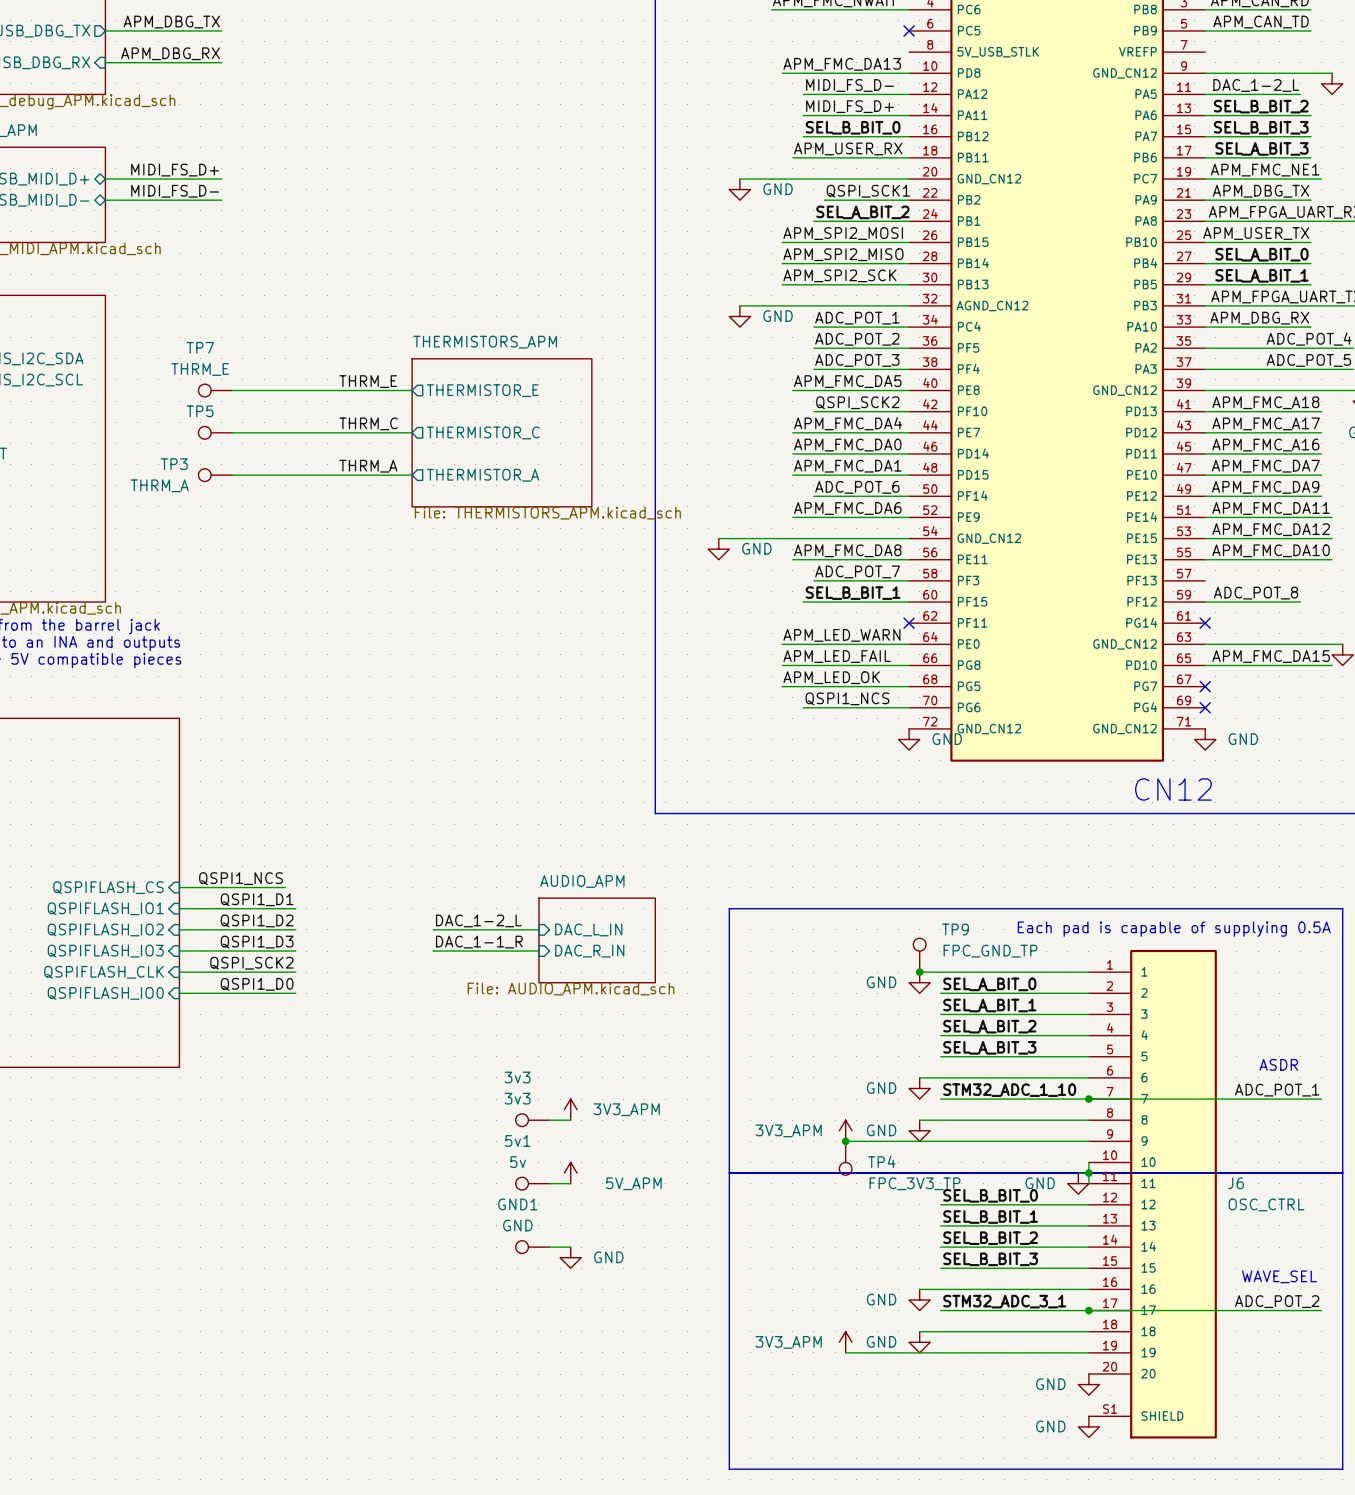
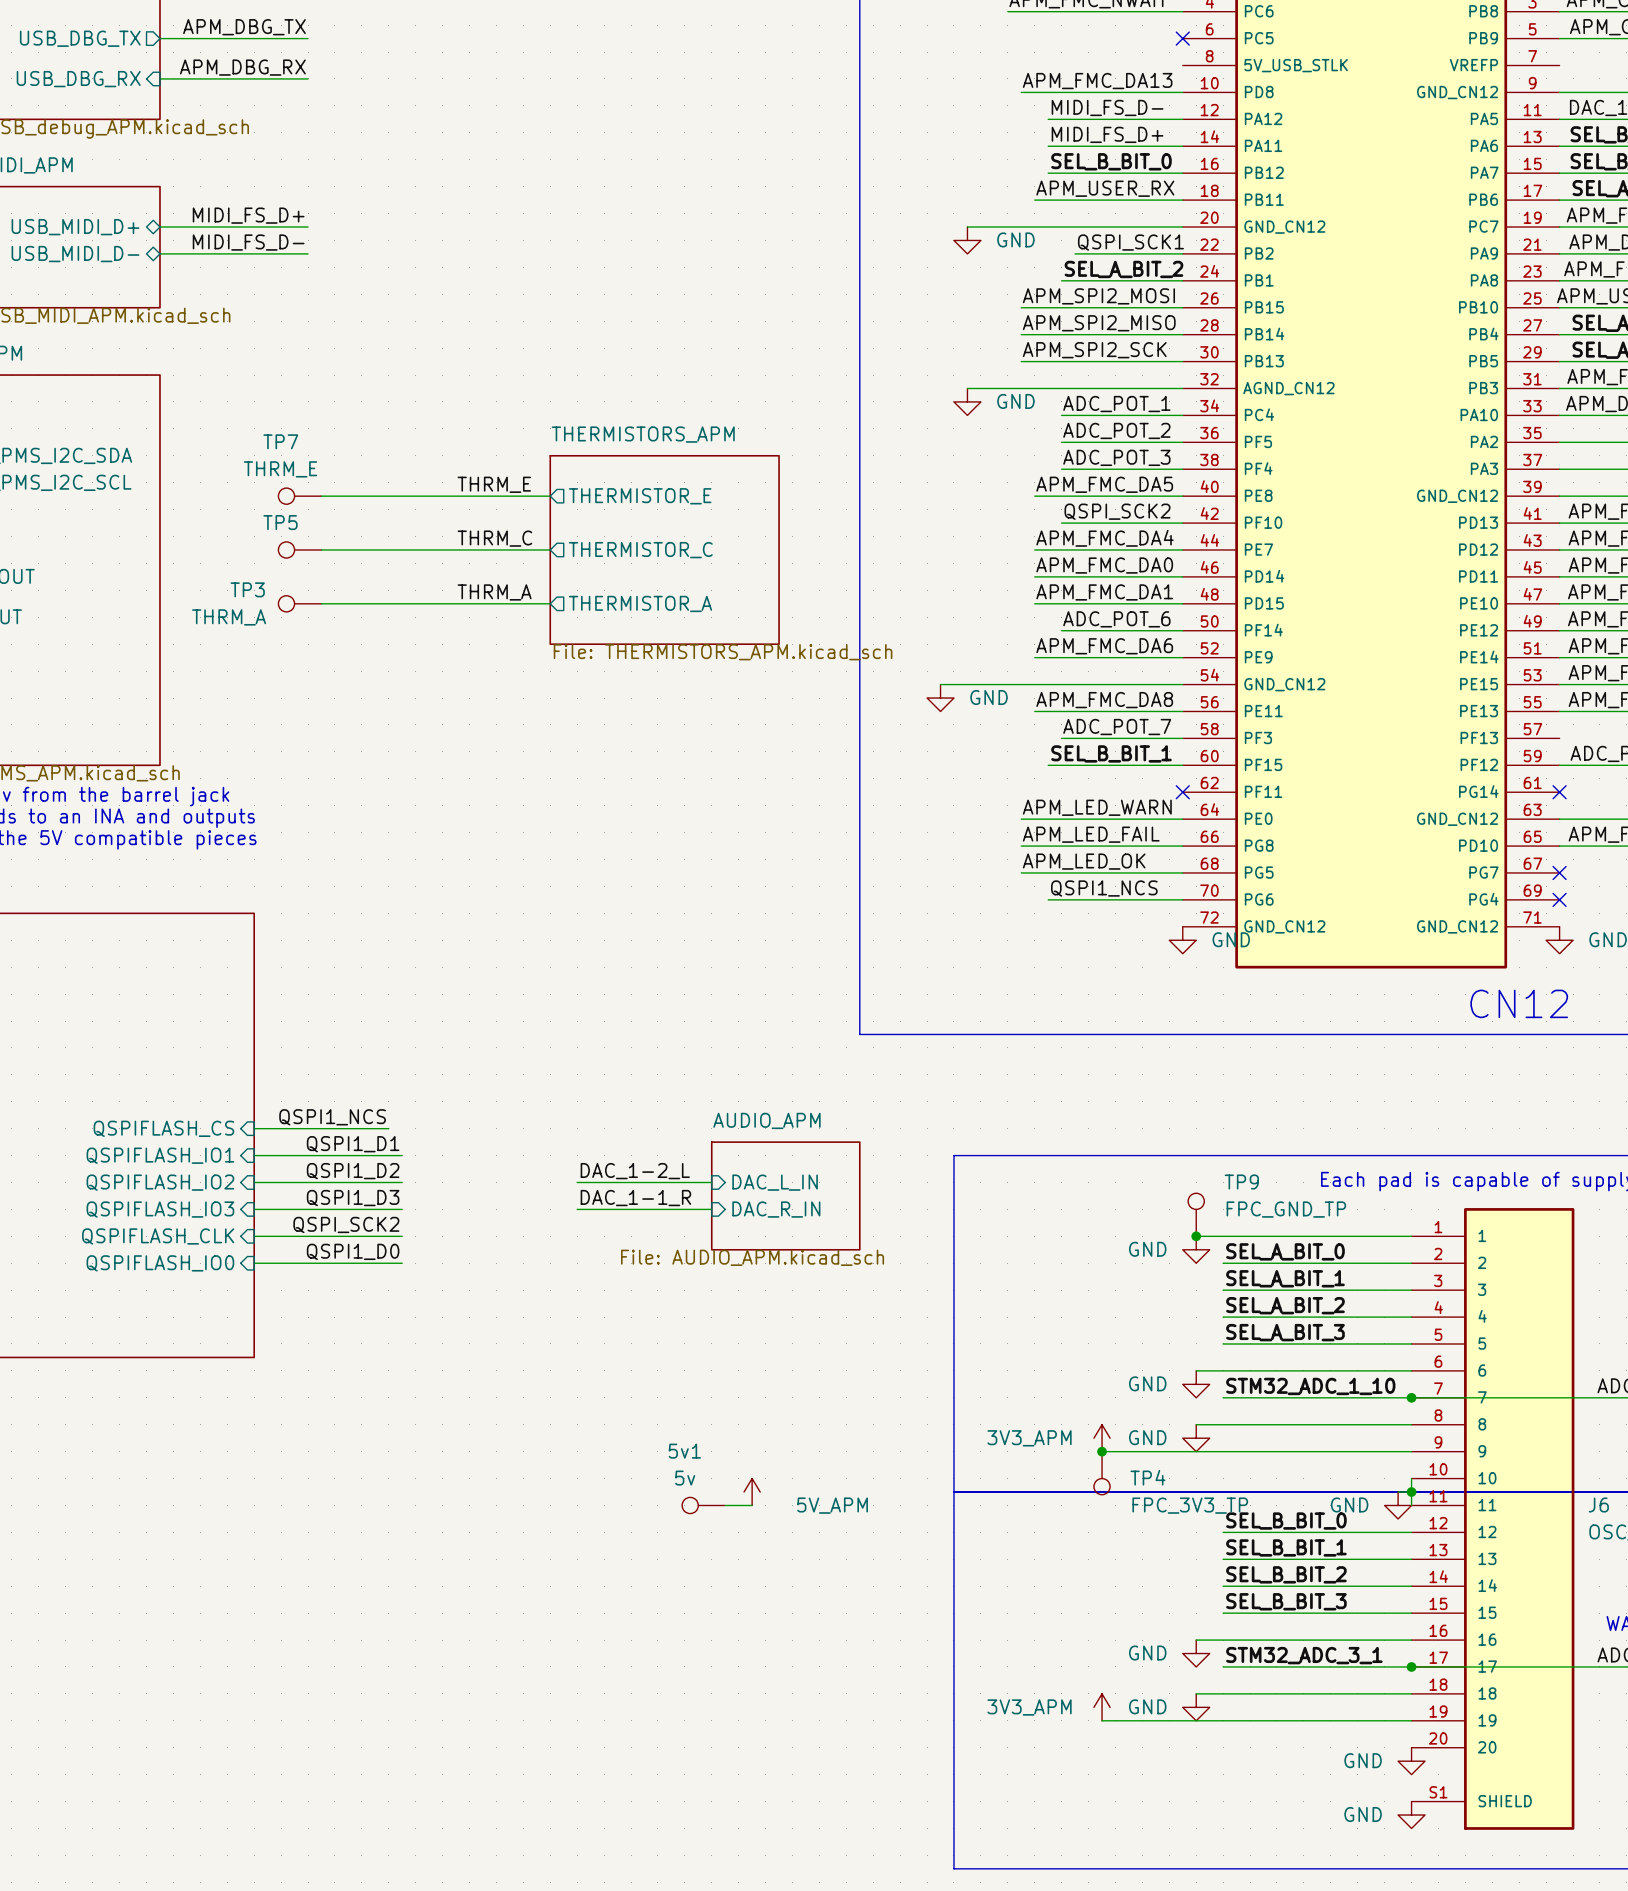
power symbol: 3V3_APM (570, 1109) -> none
3v3: 3v3 (532, 1120) -> none
wire: (549, 1120) (570, 1120) -> none
GND1: GND (532, 1247) -> none
wire: (549, 1247) (570, 1247) -> none
power symbol: GND (570, 1257) -> none

